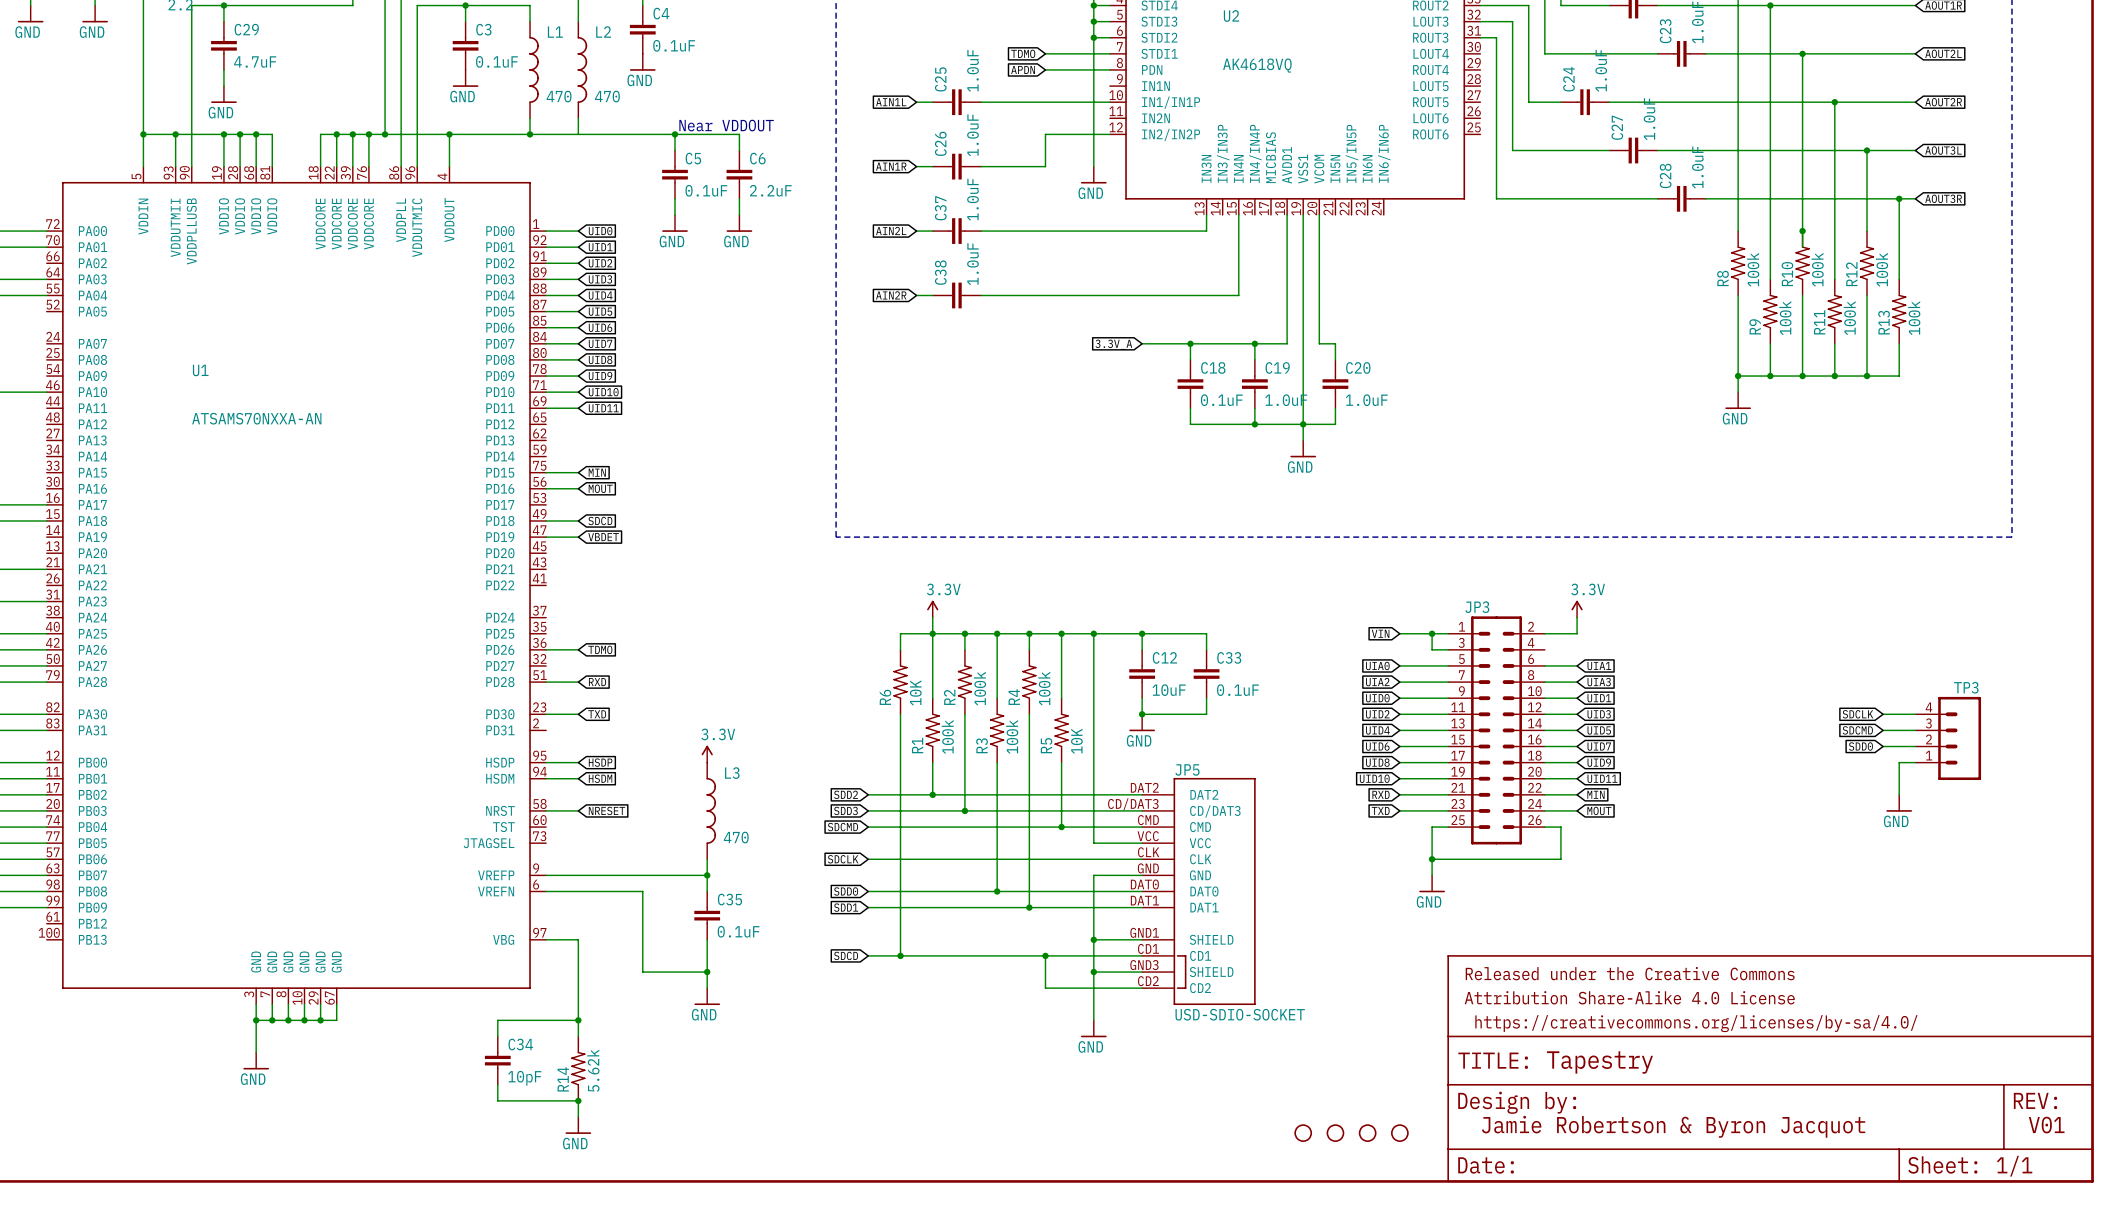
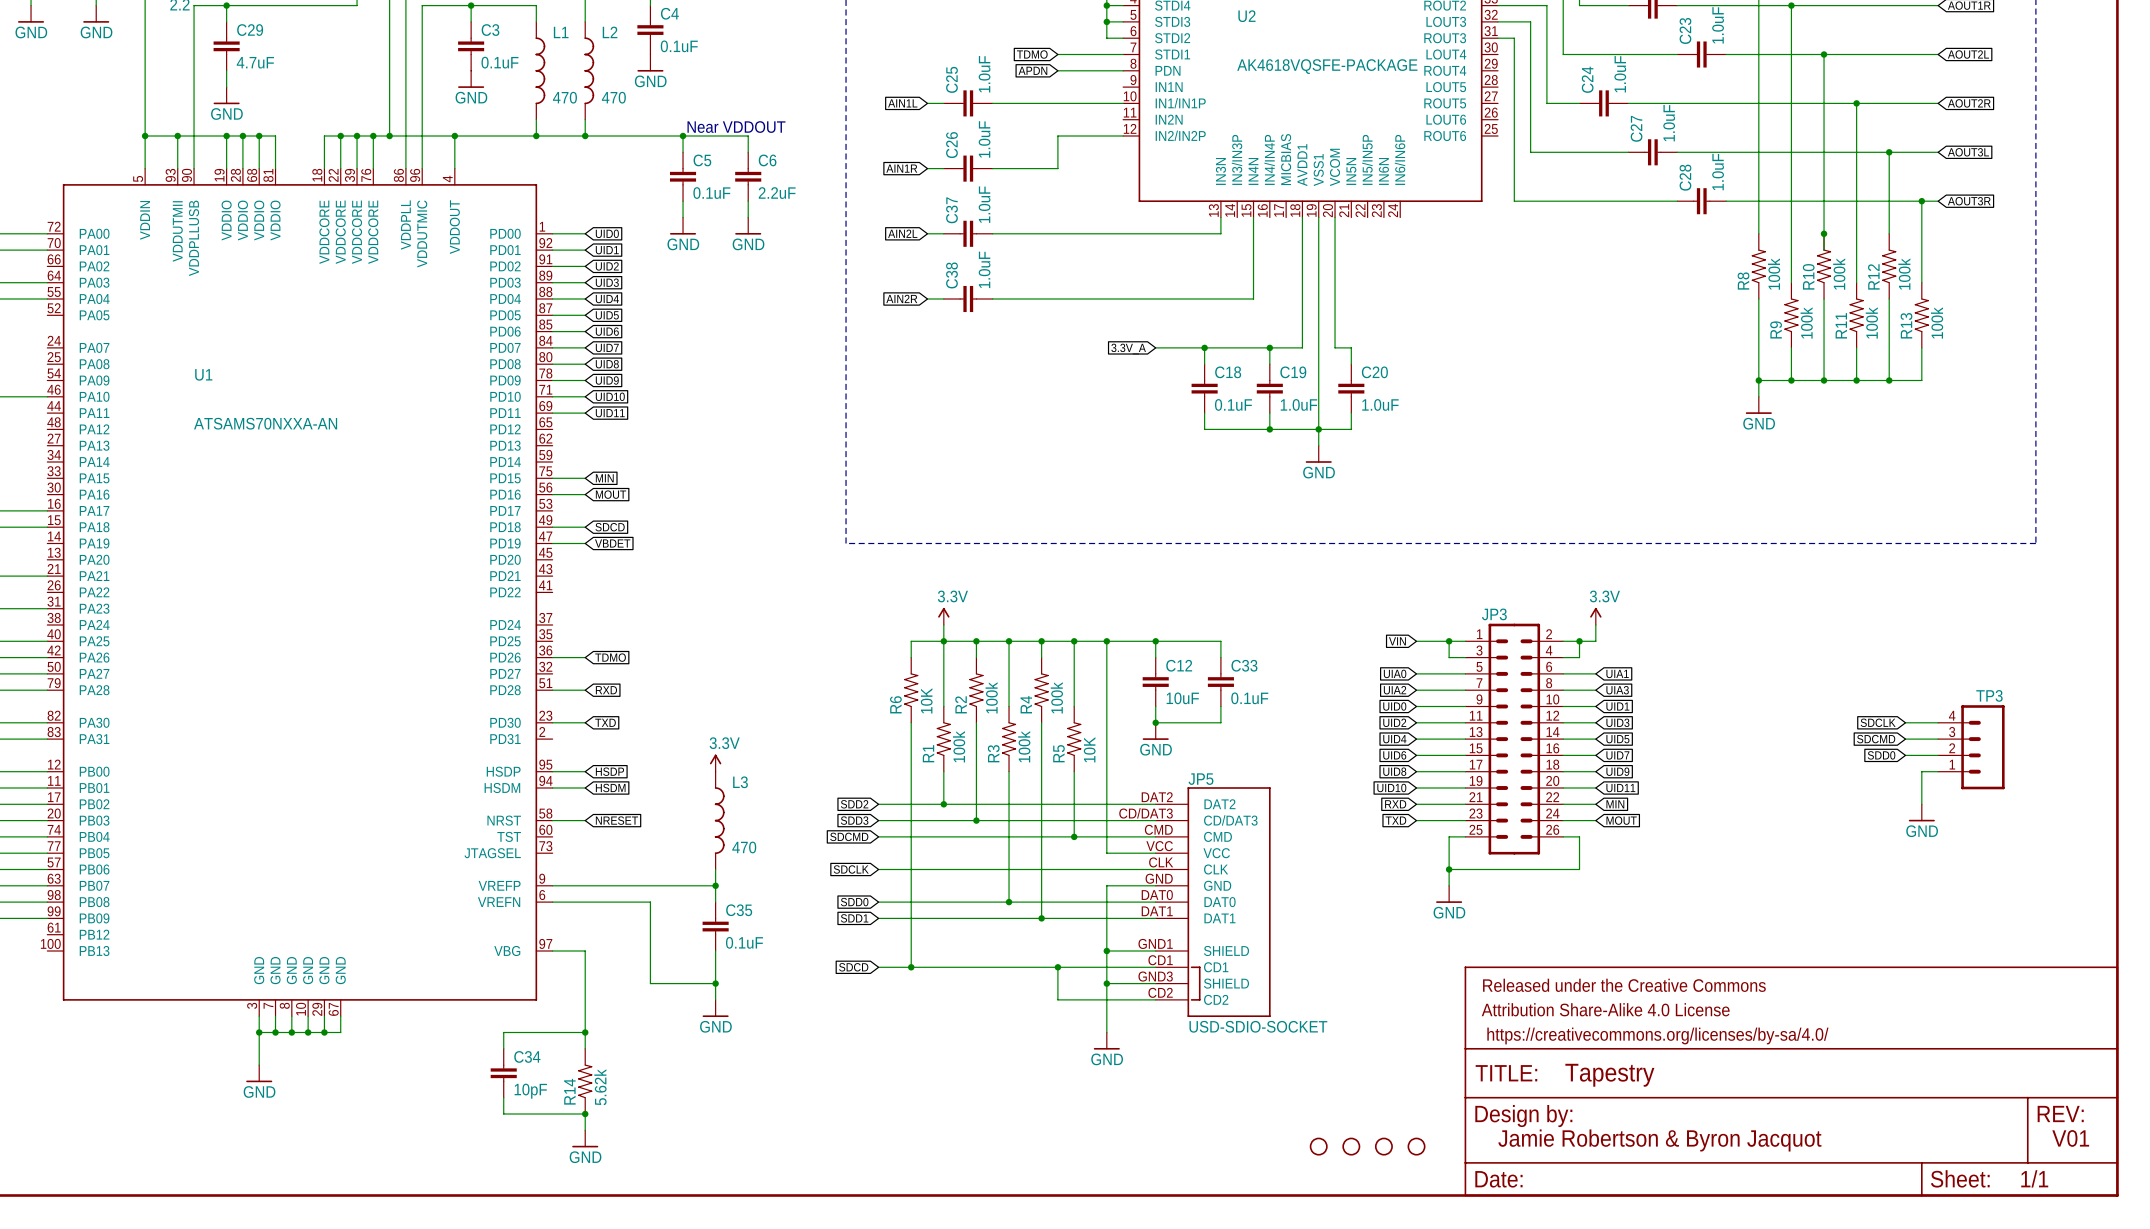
wire: (1093, 37) (1093, 166) -> none
junction: (1093, 37) -> none
U2 value: AK4618VQ (1257, 65) -> AK4618VQSFE-PACKAGE (1327, 66)
junction: none -> (585, 136)
power symbol: GND (1093, 175) -> none
wire: none -> (1579, 641) (1579, 657) (1563, 657)
junction: none -> (1579, 641)

